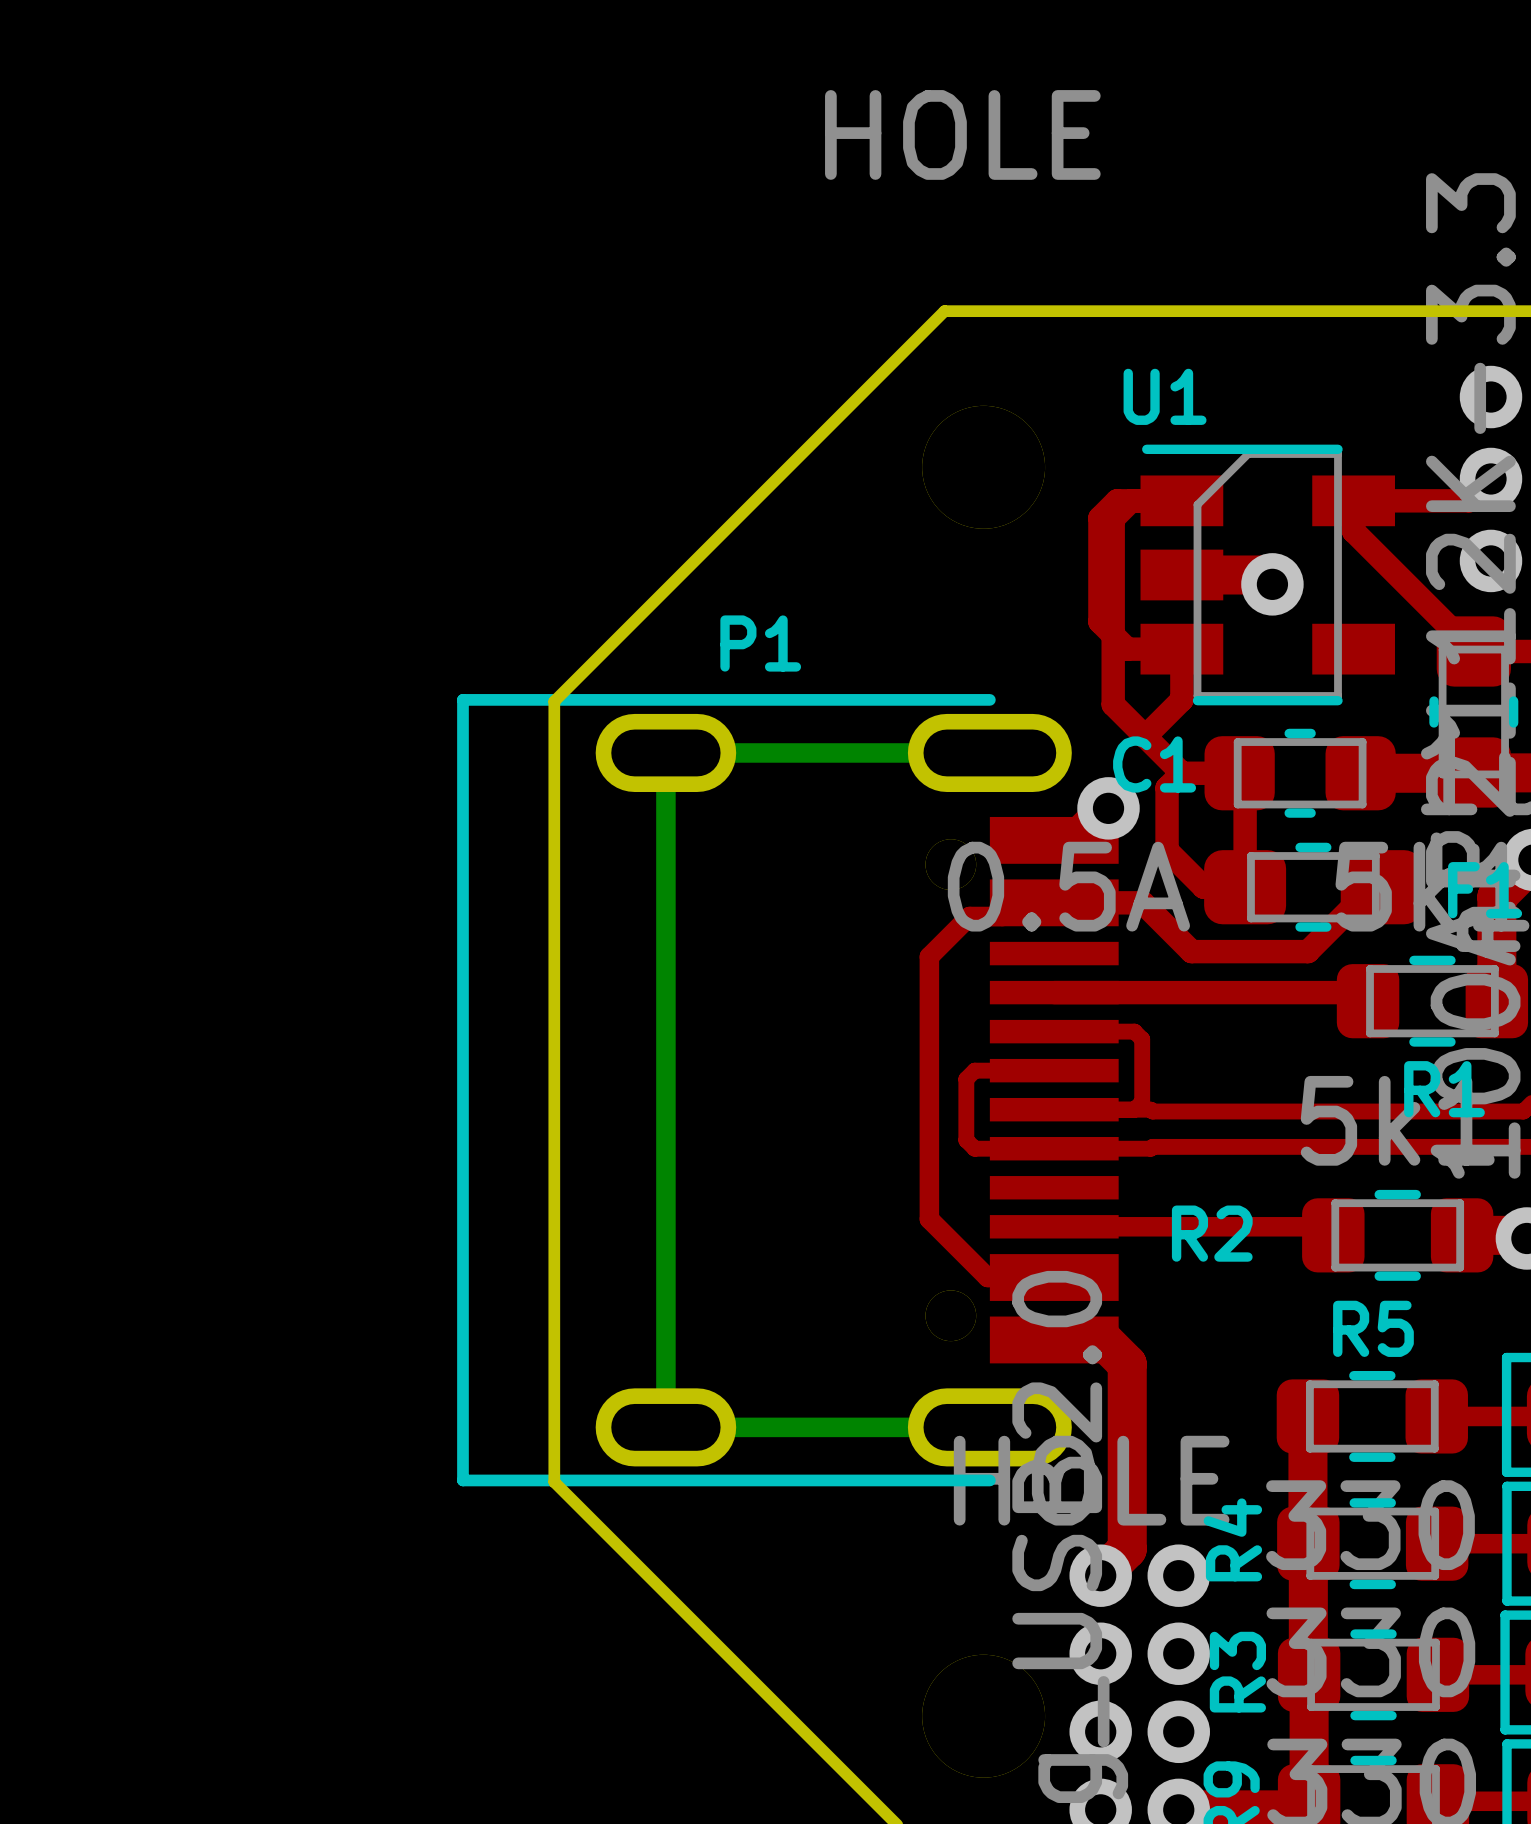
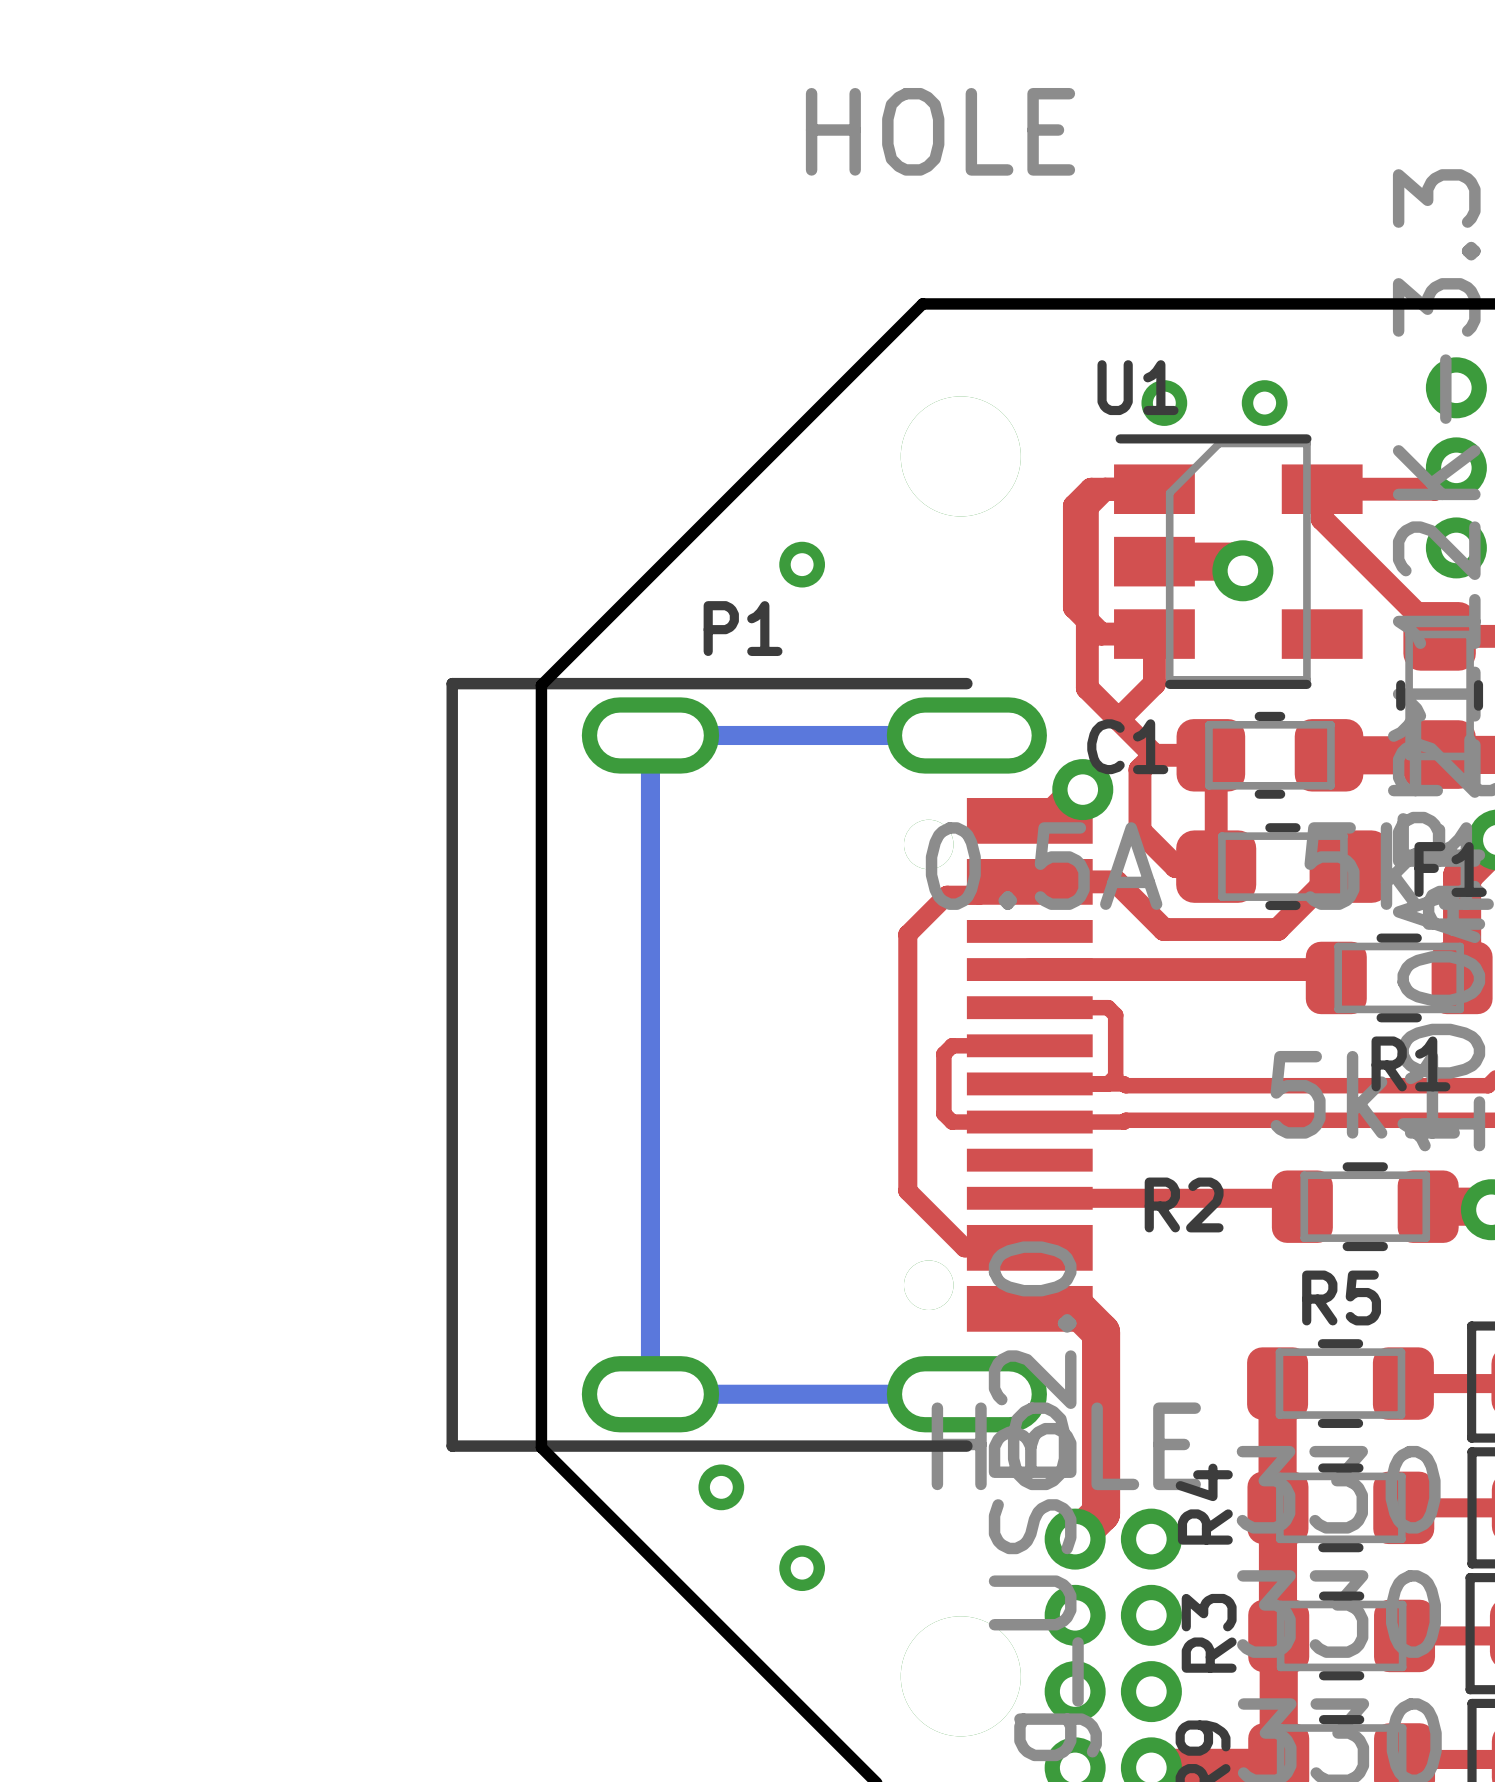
via: none -> (1164, 403)
via: none -> (1264, 403)
via: none -> (802, 564)
via: none -> (721, 1487)
via: none -> (802, 1568)

